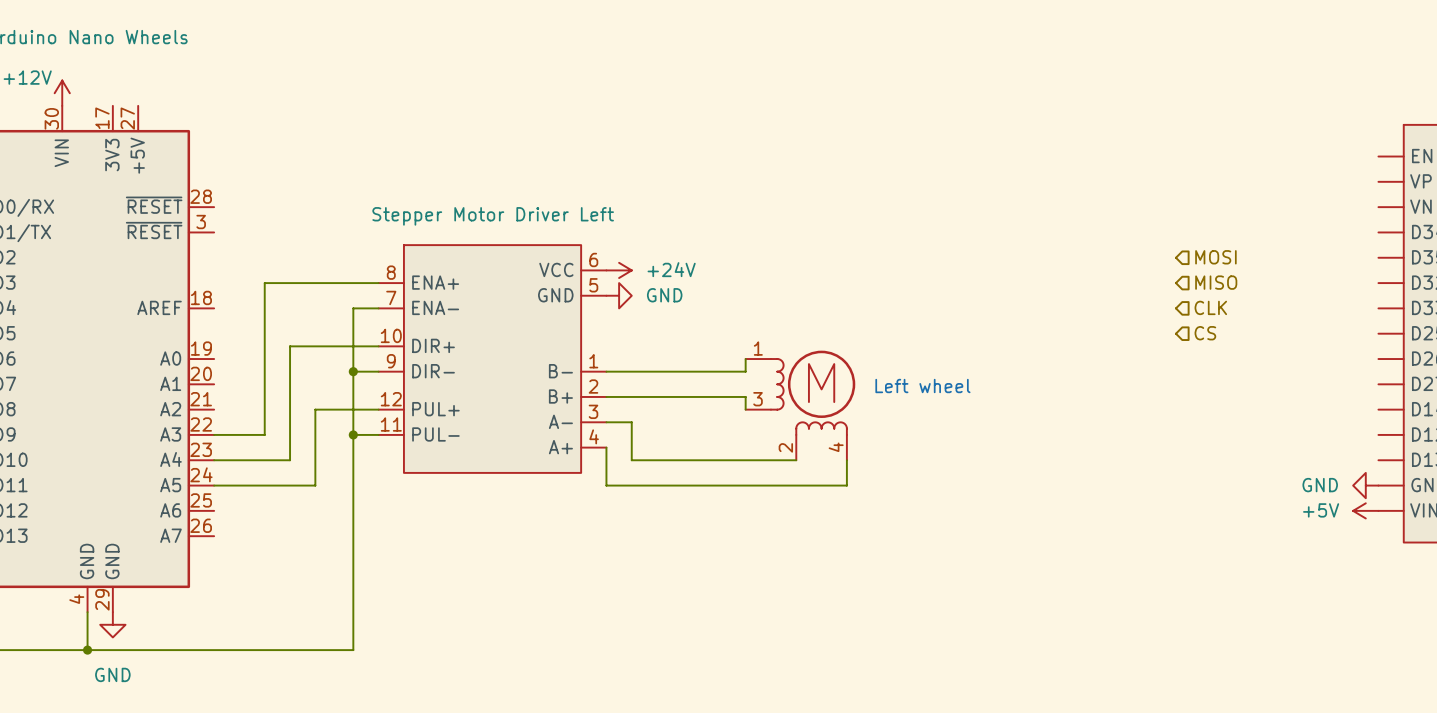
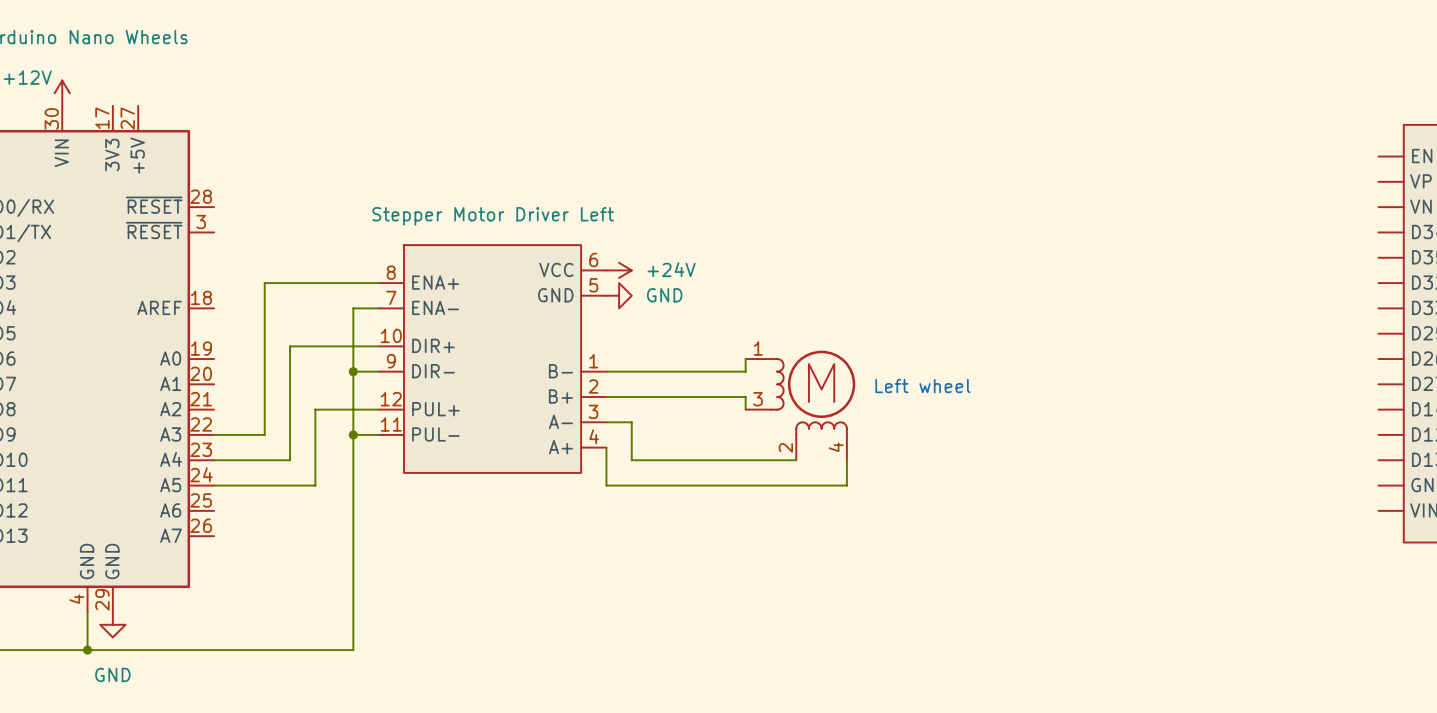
hierarchical label: MOSI (1215, 257) -> none
hierarchical label: MISO (1216, 282) -> none
hierarchical label: CLK (1210, 307) -> none
hierarchical label: CS (1205, 333) -> none
power symbol: GND (1365, 485) -> none
power symbol: +5V (1365, 510) -> none

